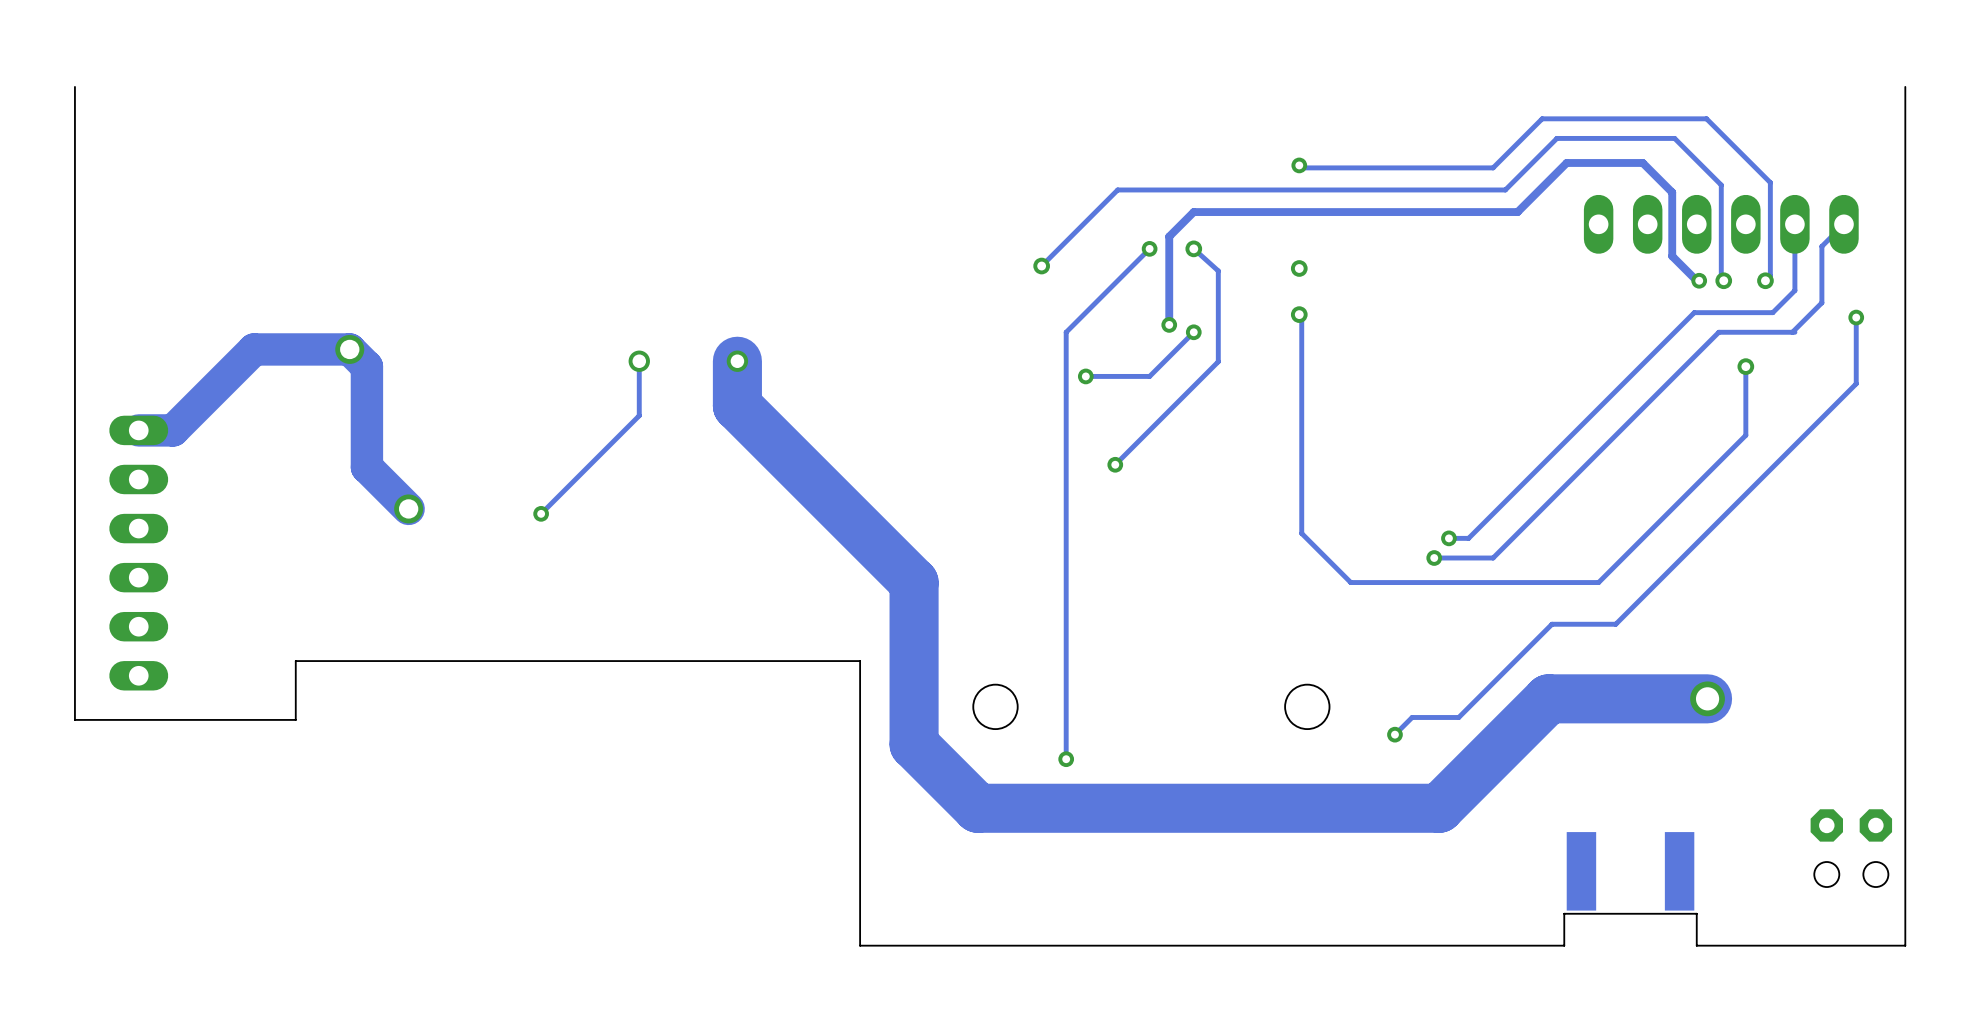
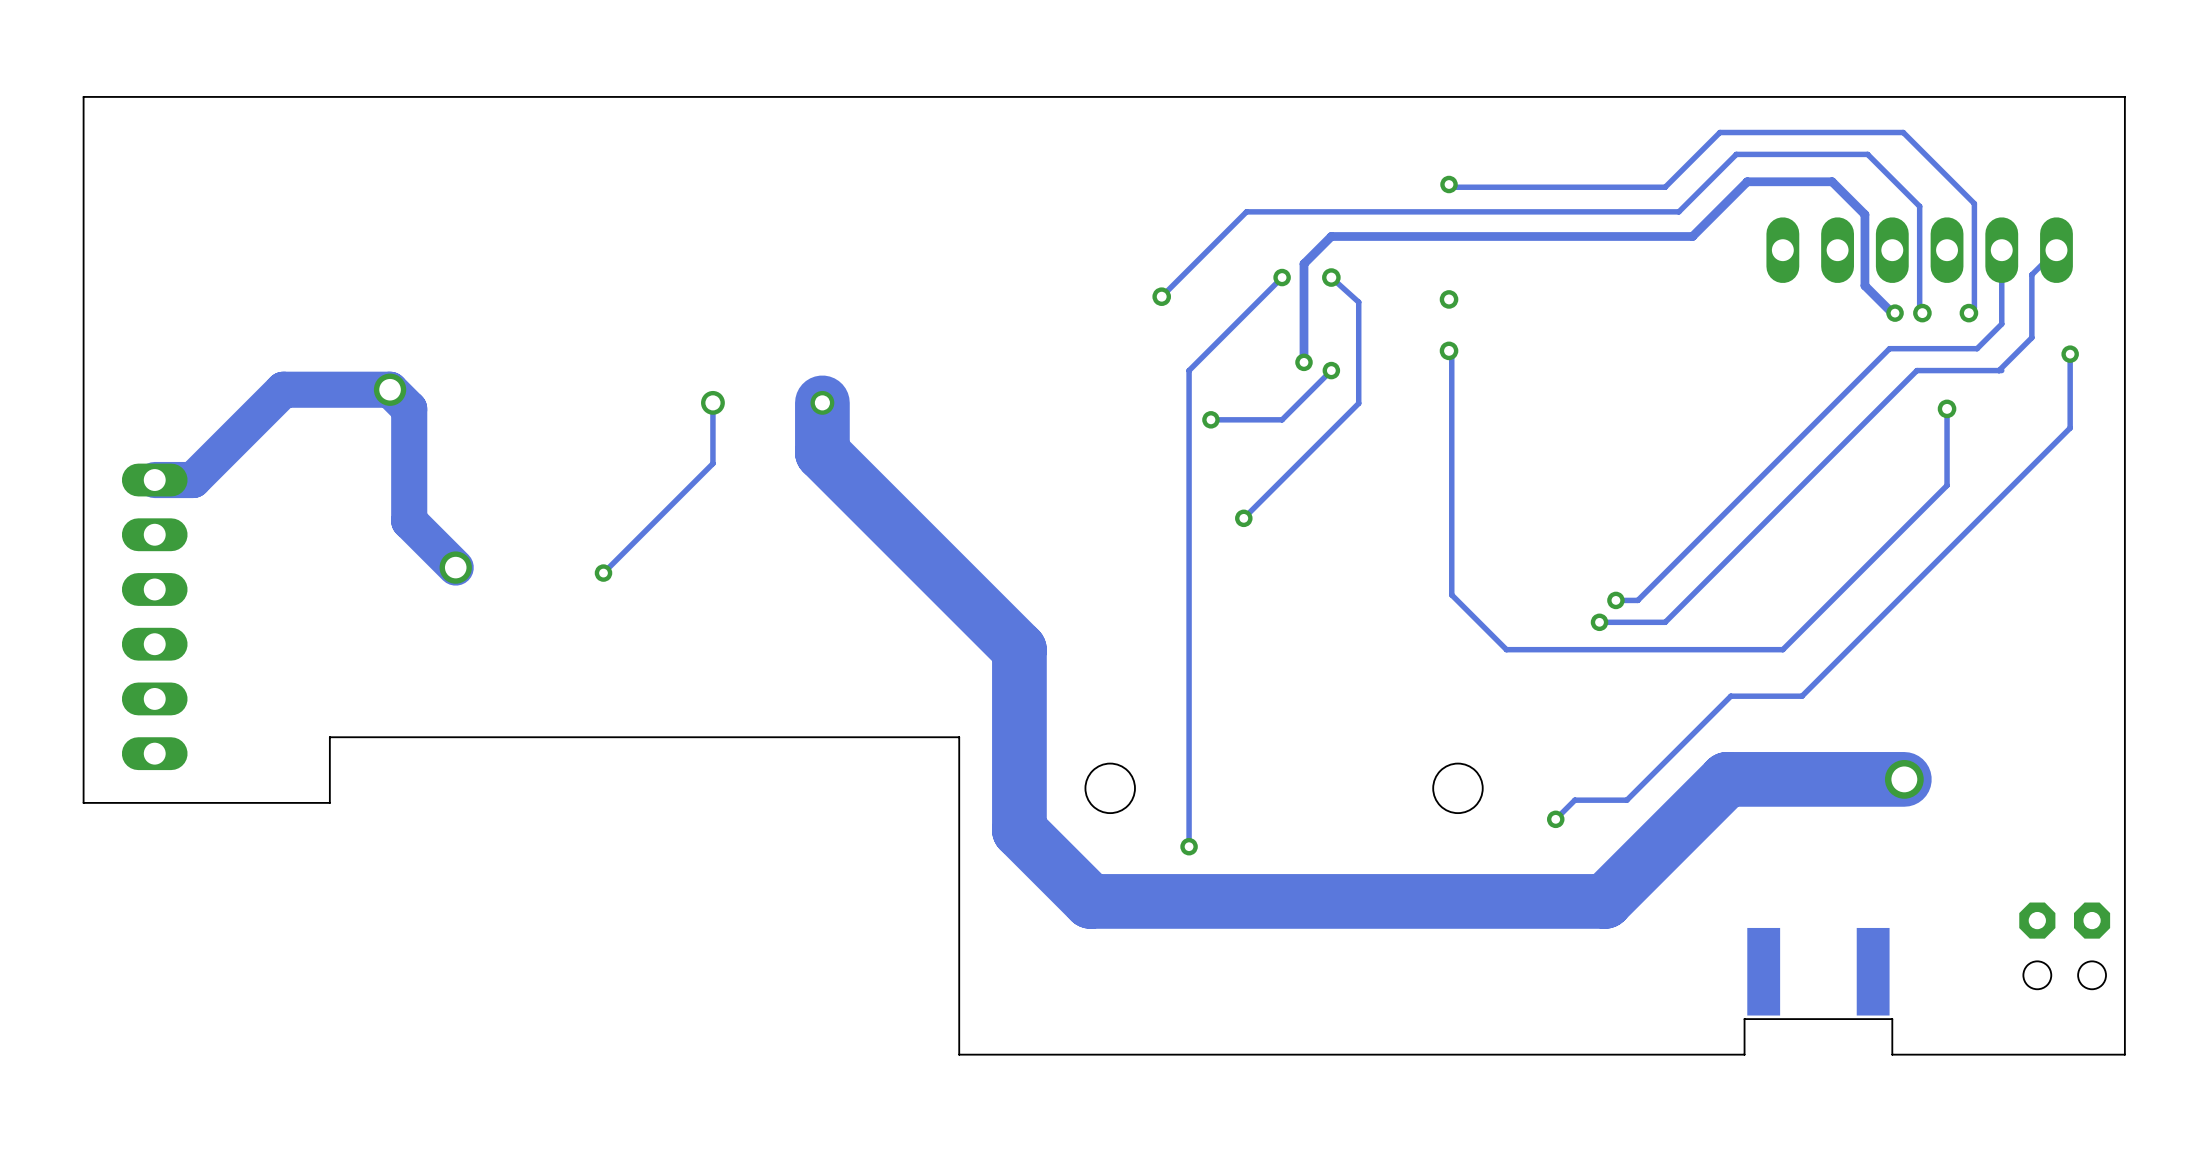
board edge: none -> (2124, 96) (83, 96)

